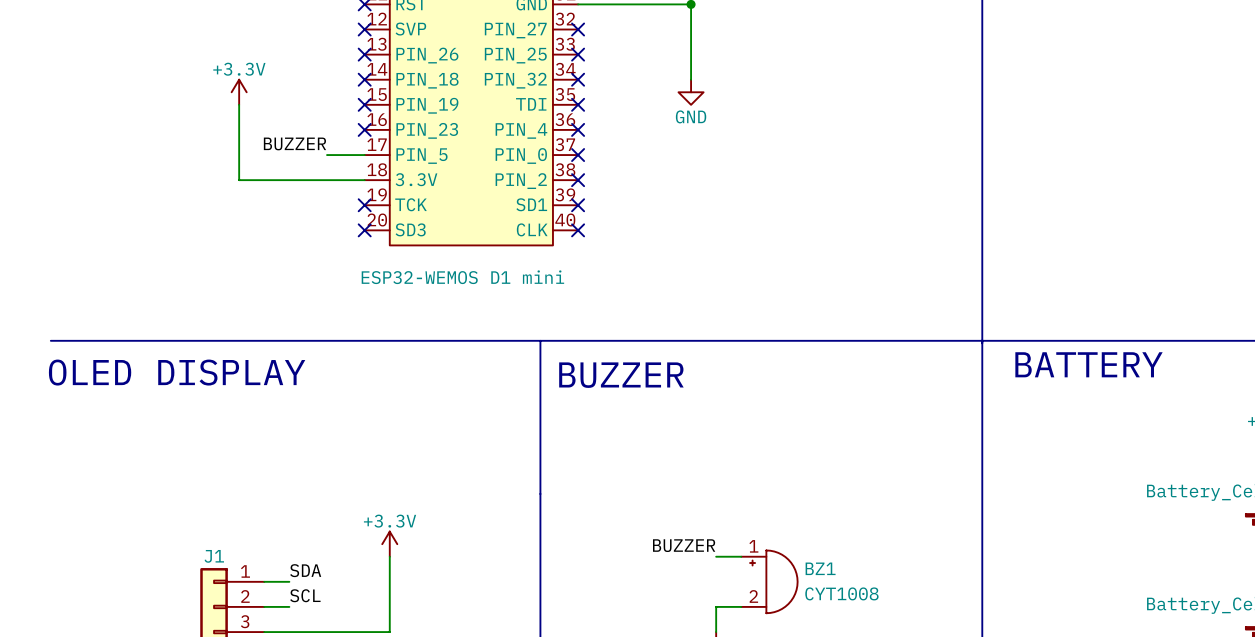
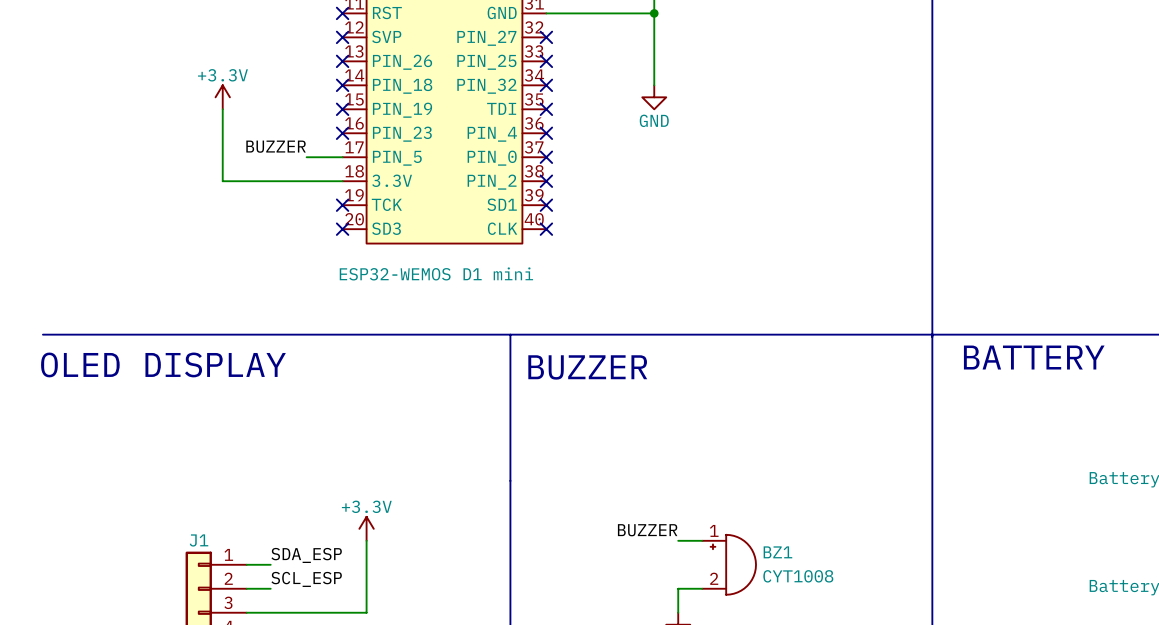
label: SDA (305, 570) -> SDA_ESP (306, 555)
label: SCL (305, 595) -> SCL_ESP (306, 579)

